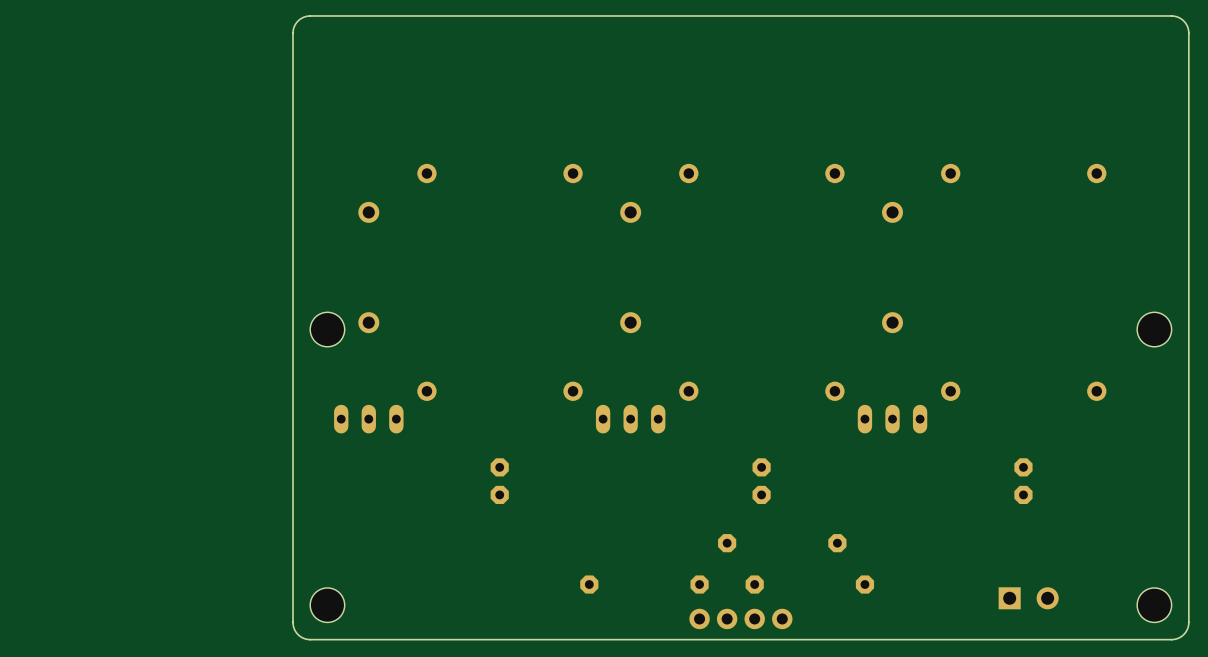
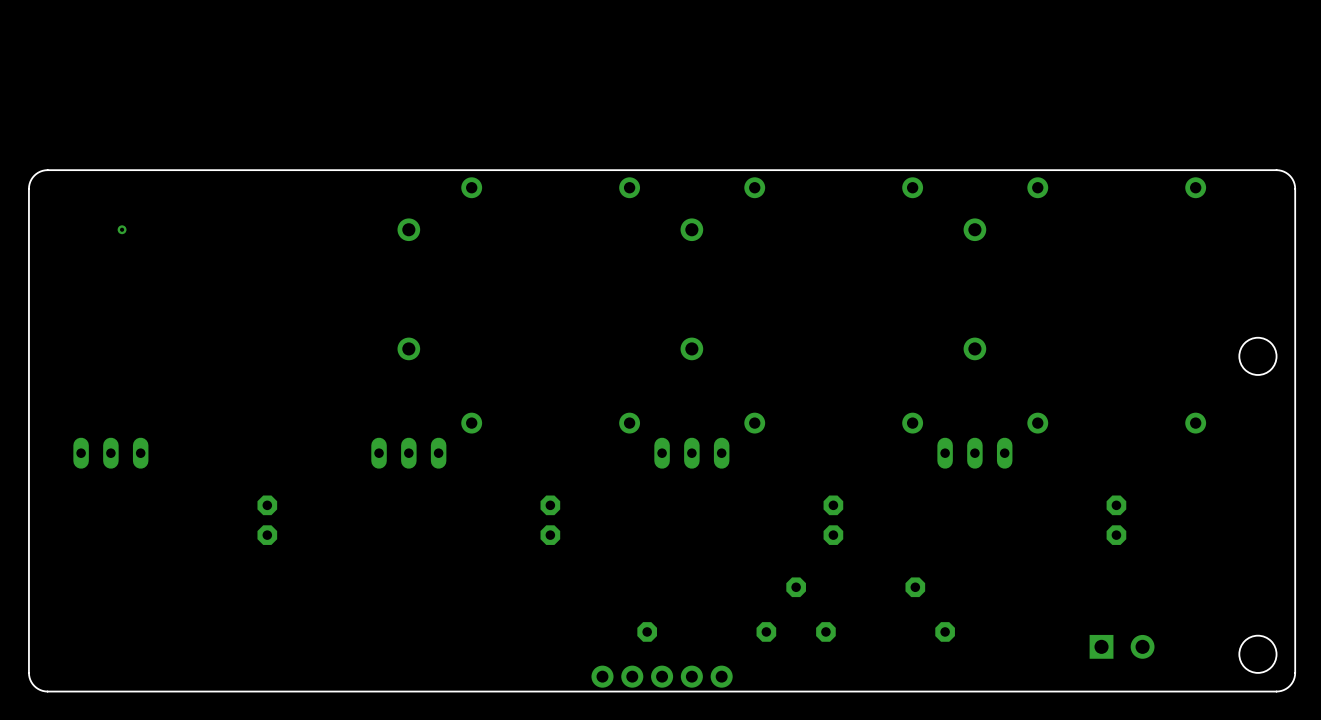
board edge: (1188, 174) (1188, 30) (1183, 21) (1173, 16) (310, 15) (301, 18) (295, 24) (292, 33) (292, 622) (298, 634) (310, 639) -> (1295, 188) (1289, 175) (1276, 170) (47, 170) (38, 172) (31, 179) (28, 188) (28, 672) (31, 682) (38, 689) (47, 691) (345, 691)
via: none -> (122, 229)
hole: (327, 329) -> none
part: none -> (110, 453)
part: none -> (267, 520)
hole: (327, 605) -> none
part: (740, 618) -> none
part: none -> (662, 676)

